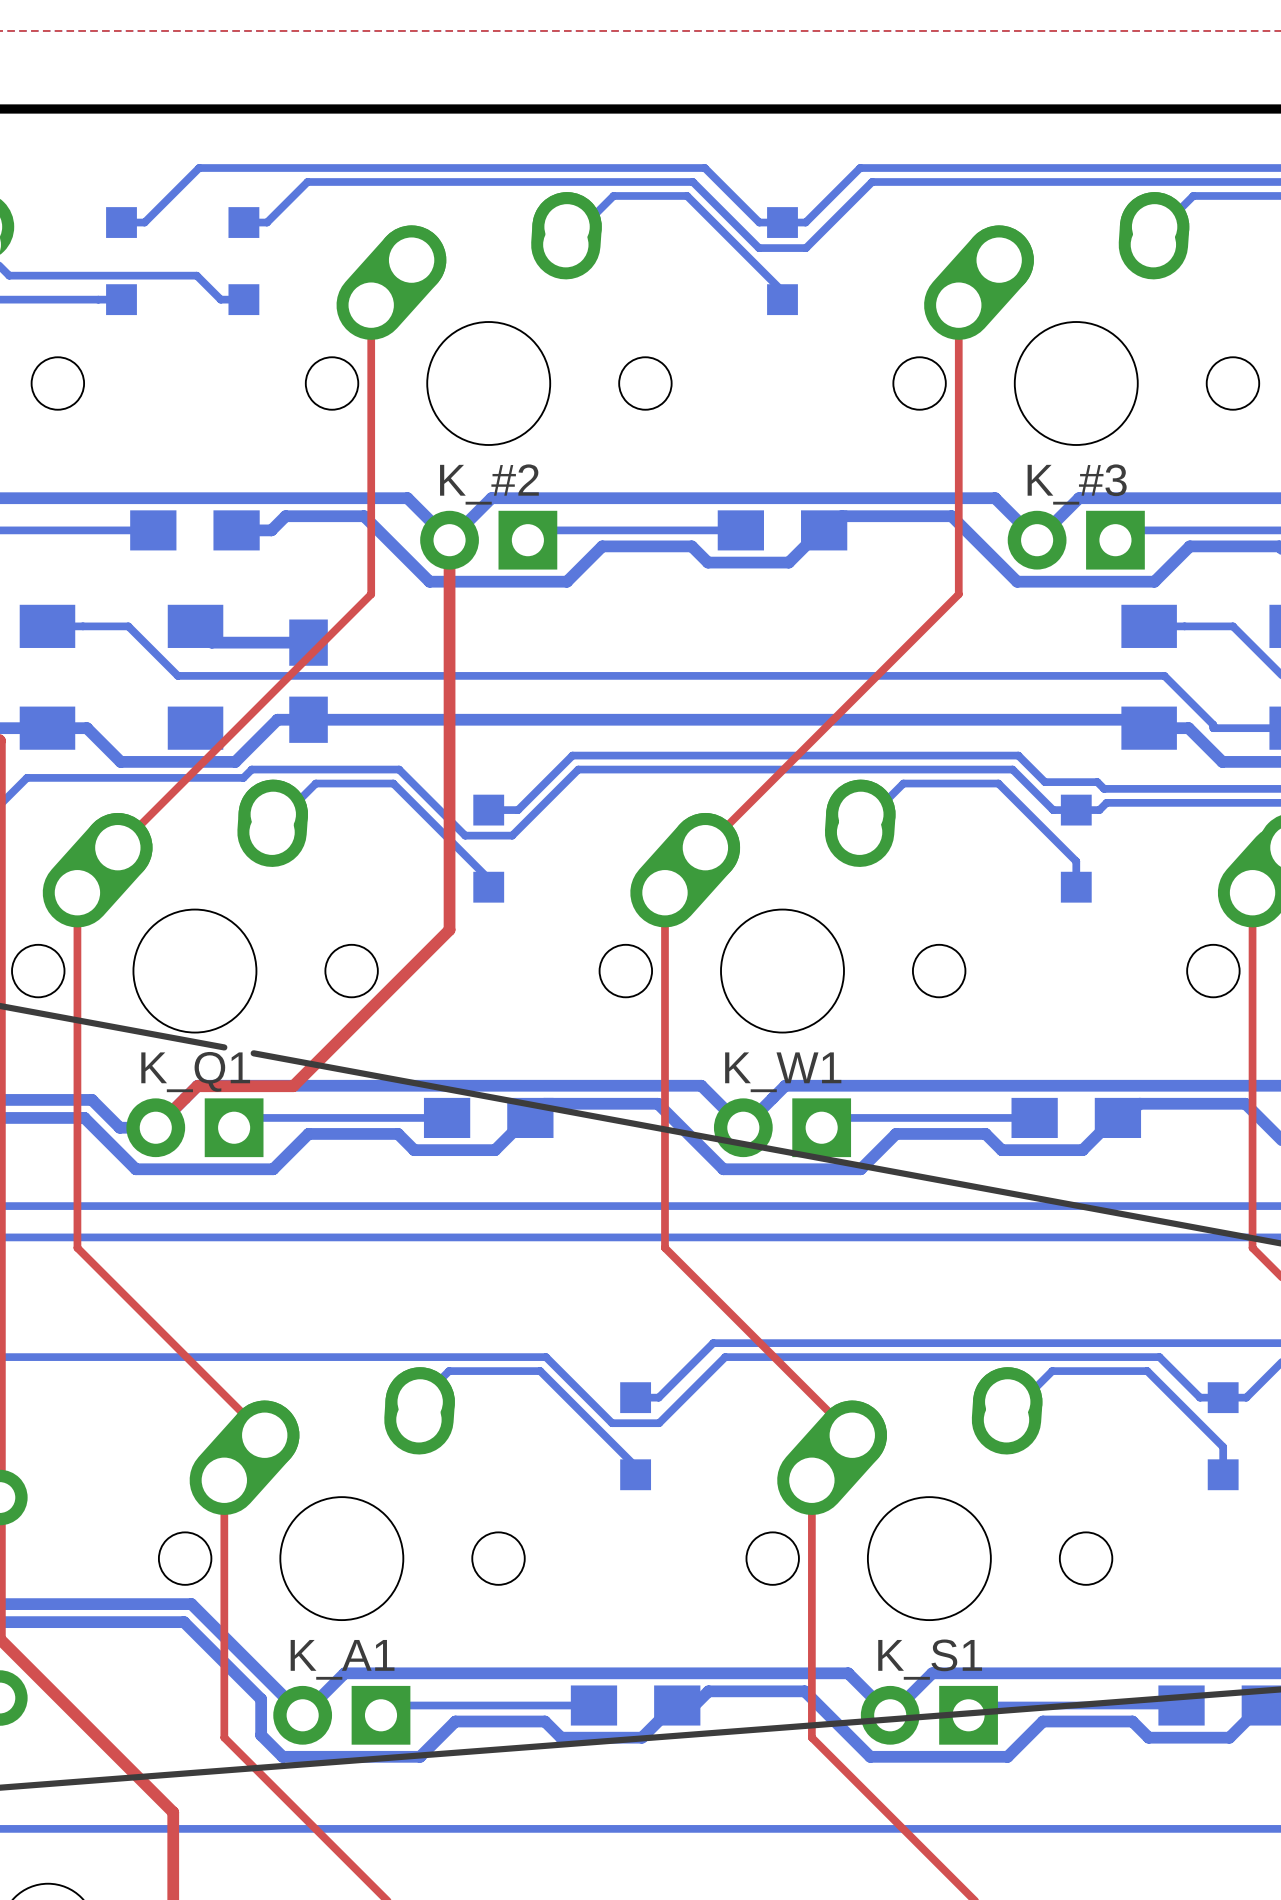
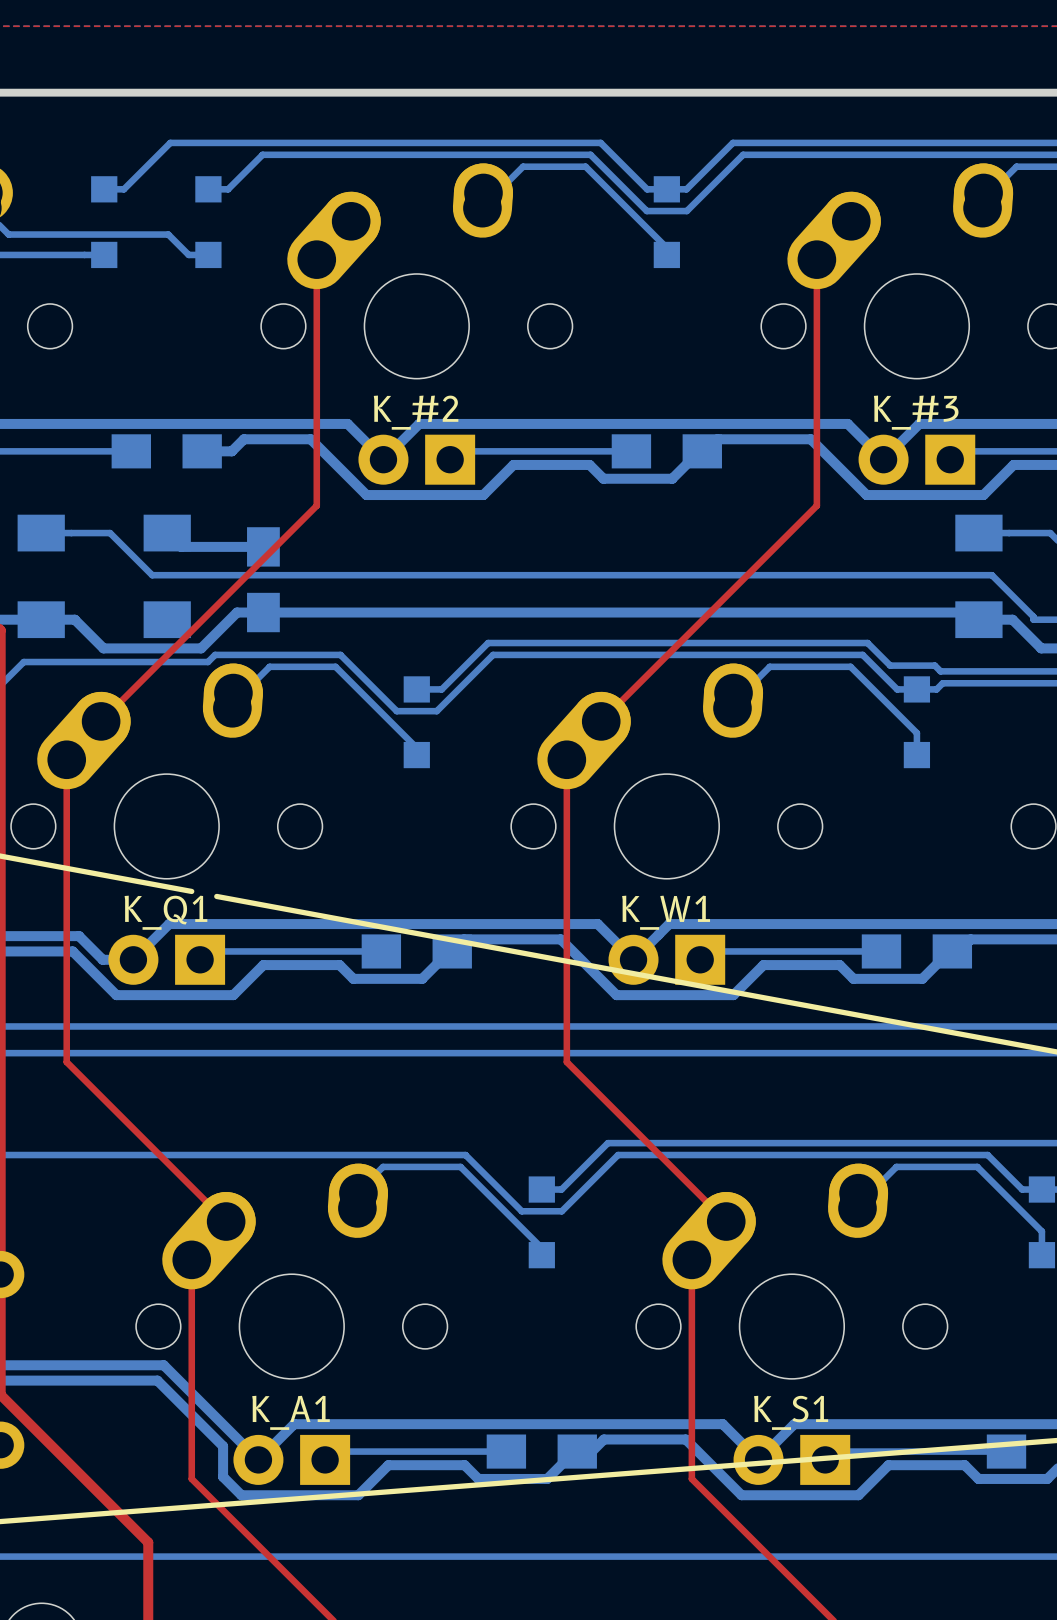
top track: (449, 540) (449, 929) (293, 1086) (197, 1086) (155, 1127) -> none

